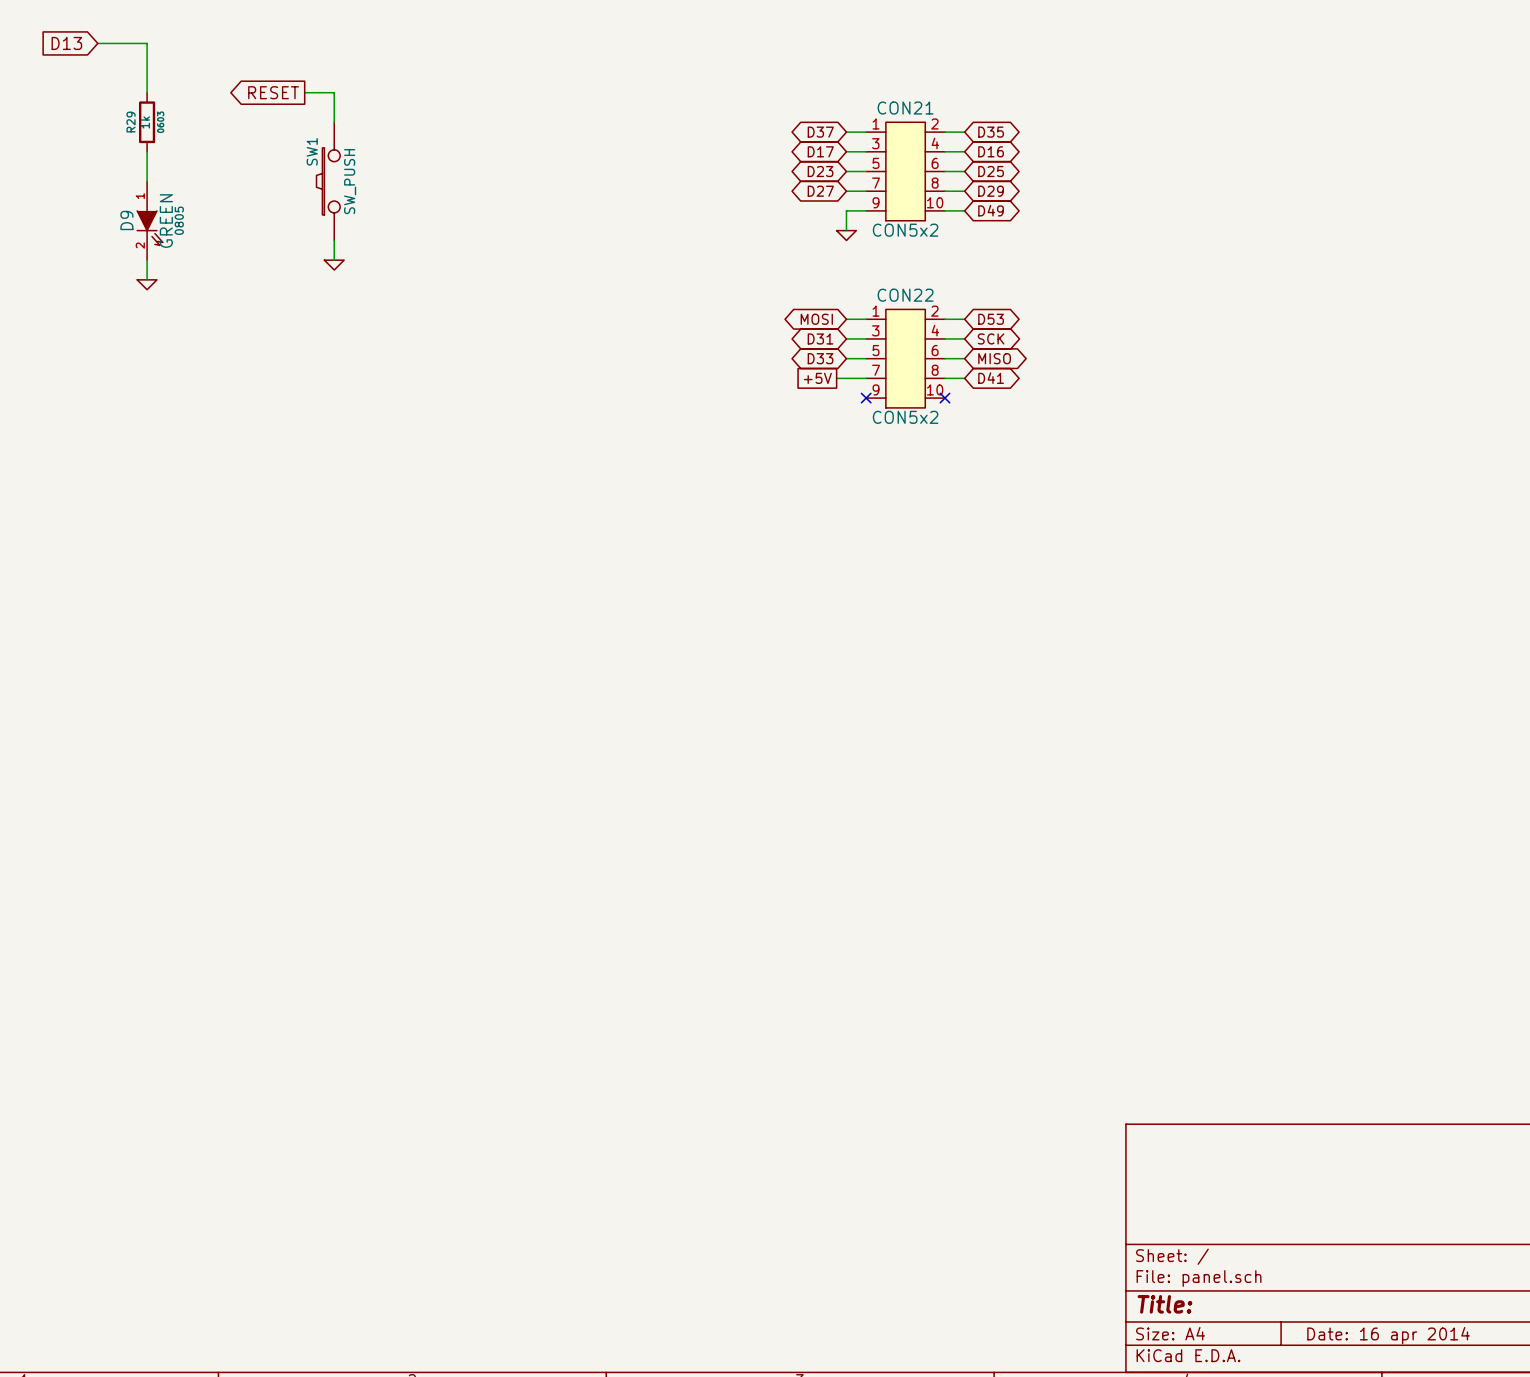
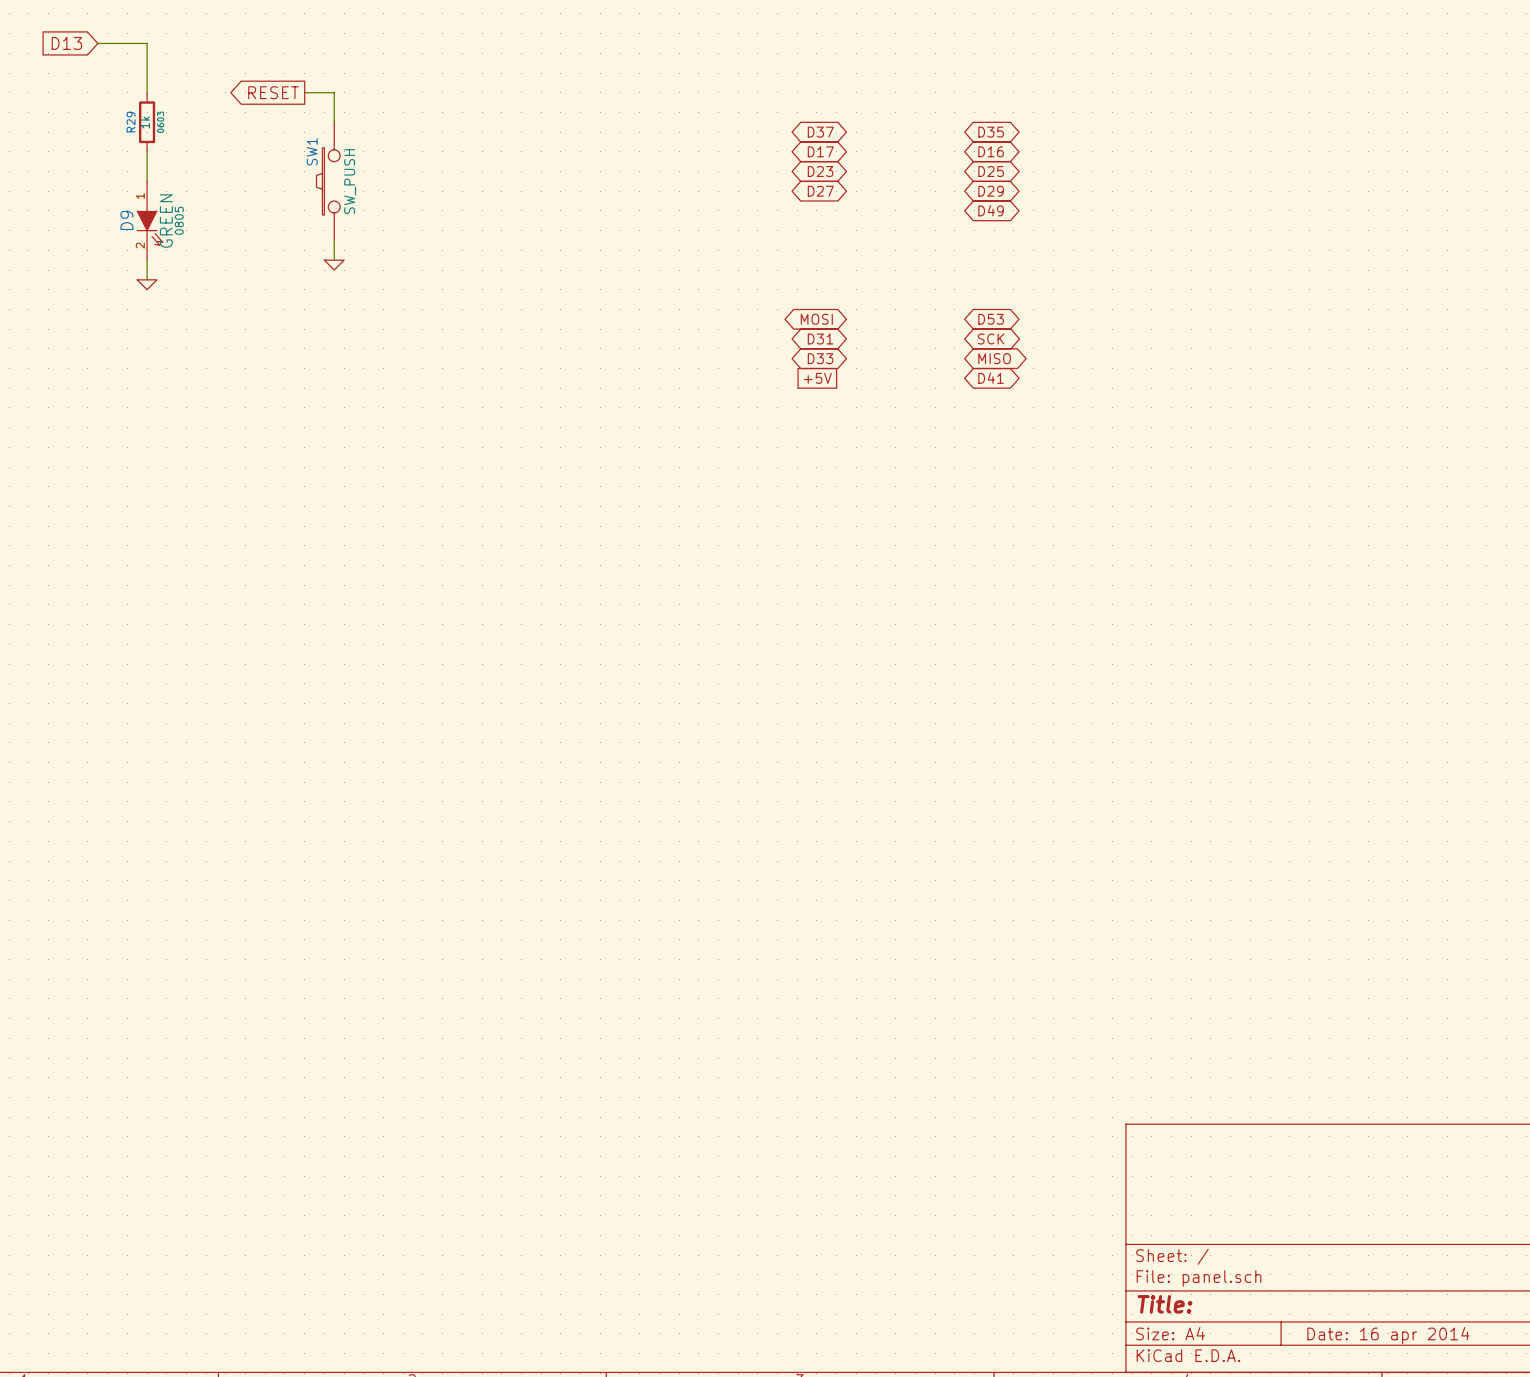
wire: (846, 132) (866, 132) -> none
wire: (944, 132) (964, 132) -> none
wire: (846, 151) (866, 151) -> none
wire: (944, 151) (964, 151) -> none
wire: (846, 171) (866, 171) -> none
CON21: CON5x2 (905, 171) -> none
wire: (944, 171) (964, 171) -> none
wire: (846, 191) (866, 191) -> none
wire: (944, 191) (964, 191) -> none
wire: (866, 210) (846, 210) (846, 230) -> none
wire: (944, 210) (964, 210) -> none
power symbol: (846, 235) -> none
wire: (846, 319) (866, 319) -> none
wire: (944, 319) (964, 319) -> none
wire: (846, 338) (866, 338) -> none
wire: (944, 338) (964, 338) -> none
wire: (846, 358) (866, 358) -> none
CON22: CON5x2 (905, 358) -> none
wire: (944, 358) (964, 358) -> none
wire: (836, 378) (866, 378) -> none
wire: (944, 378) (964, 378) -> none
no-connect mark: (866, 398) -> none
no-connect mark: (944, 398) -> none

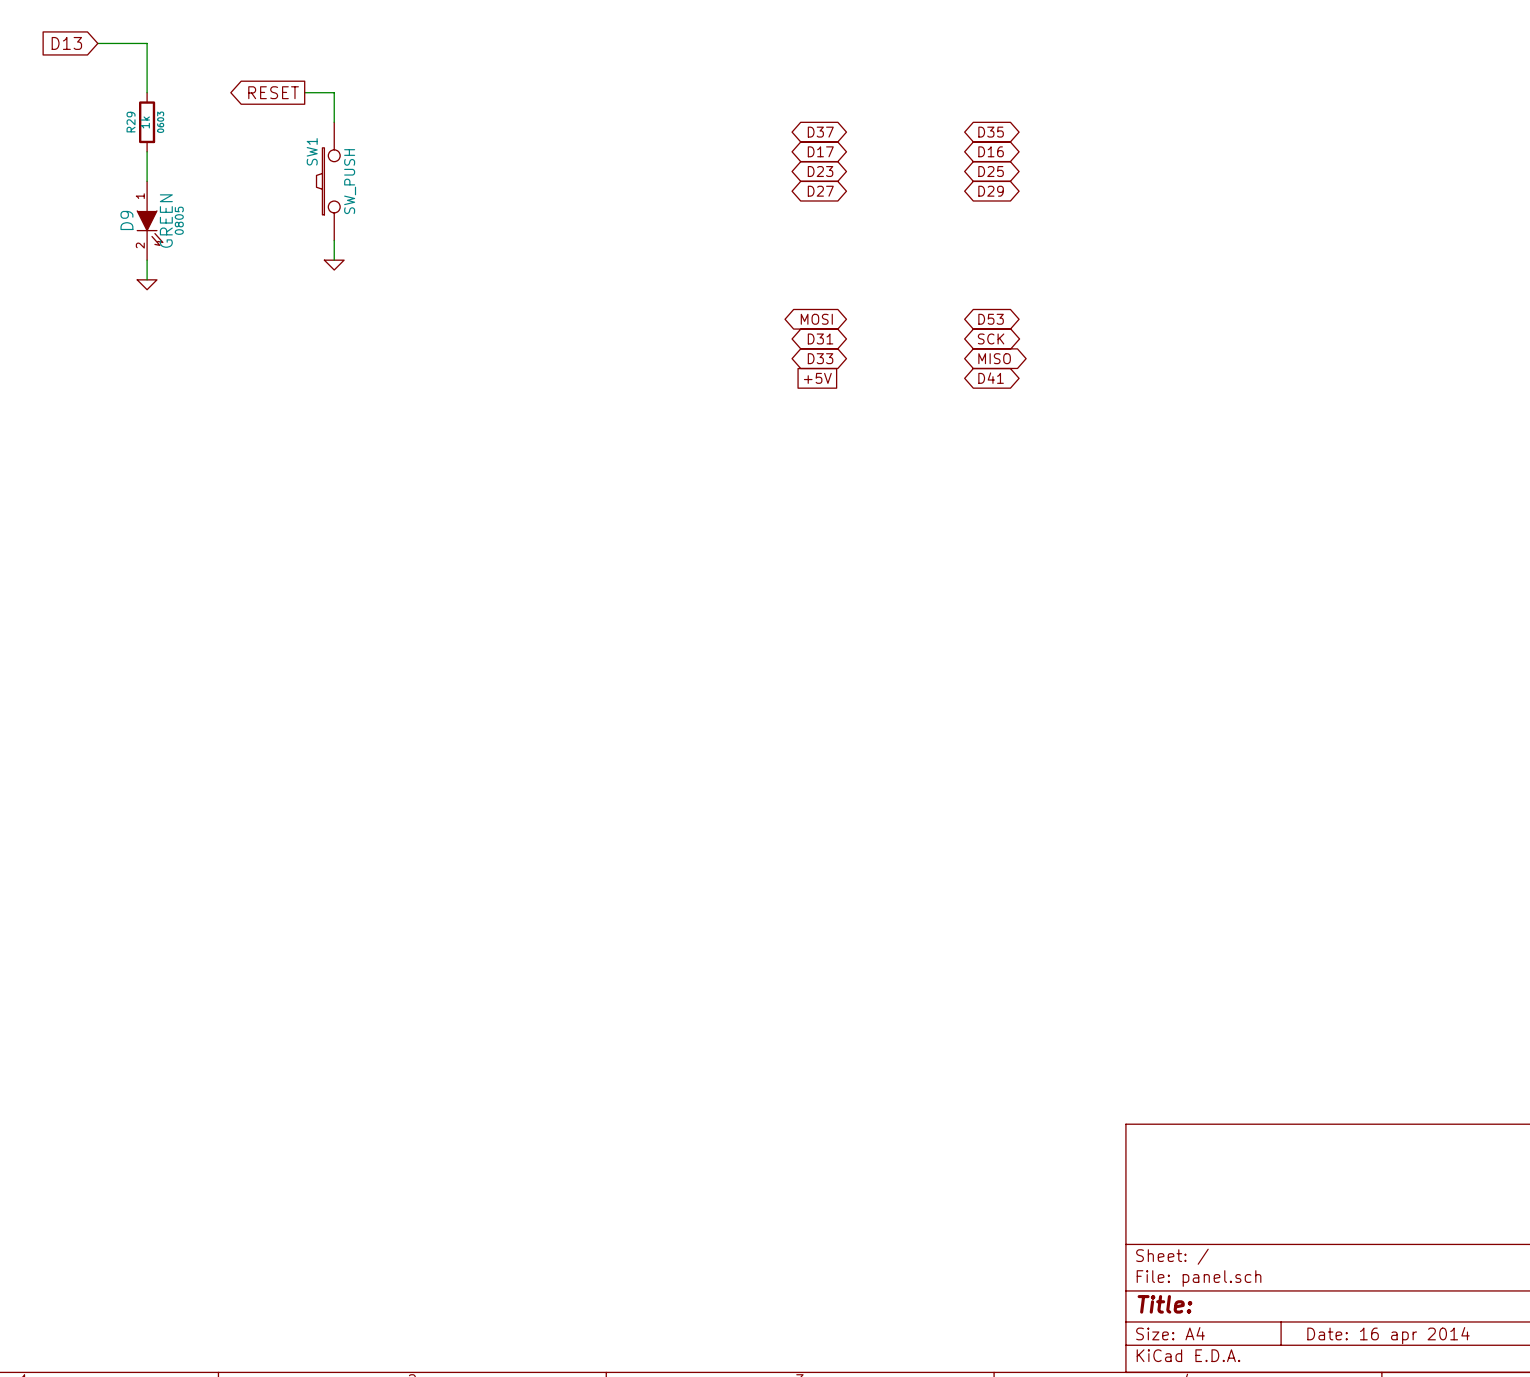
global label: D49 (991, 210) -> none

